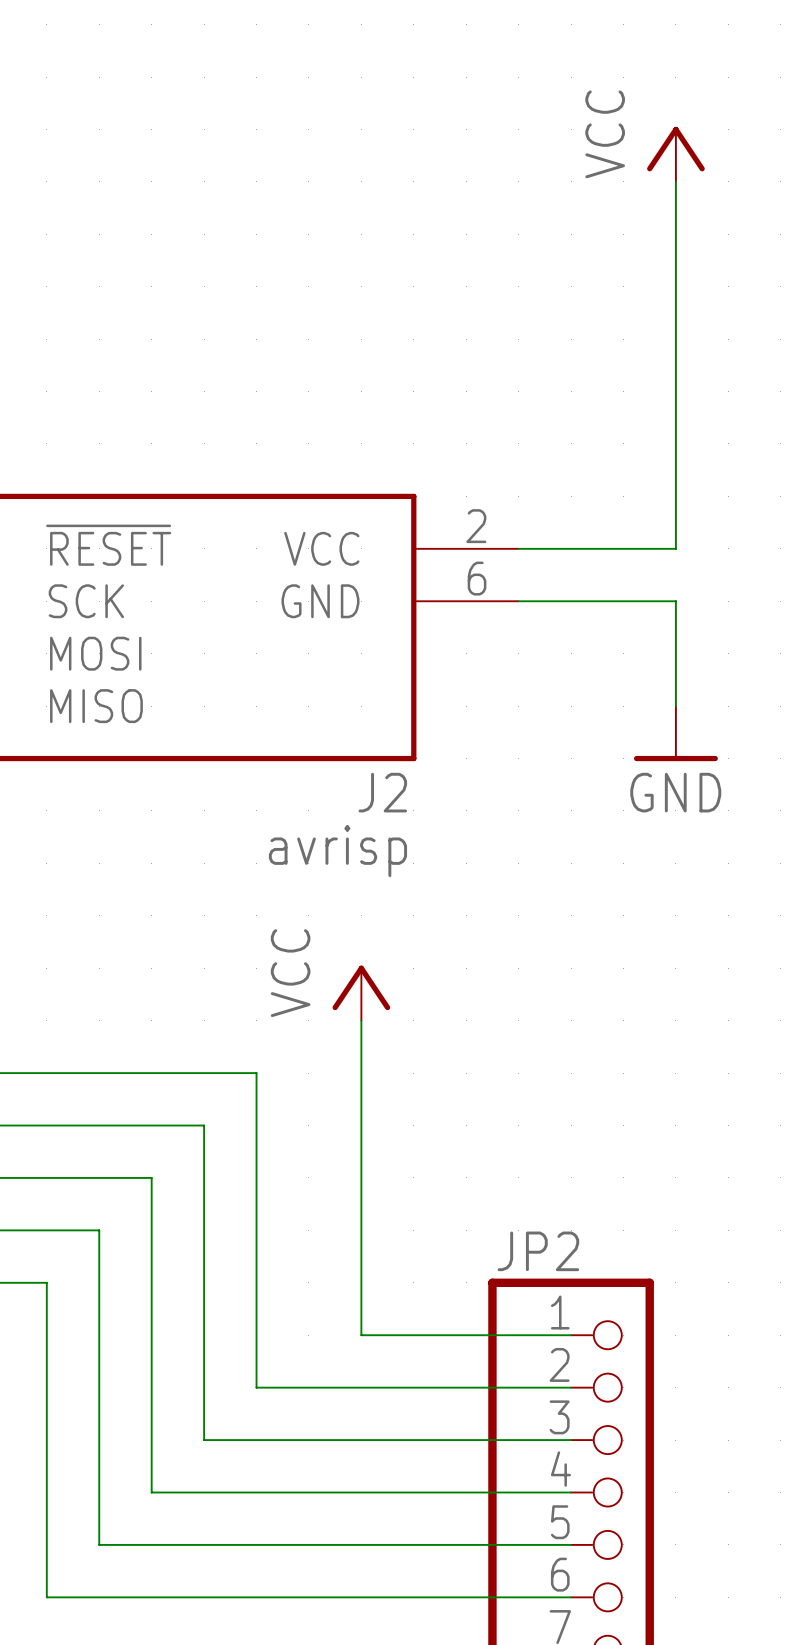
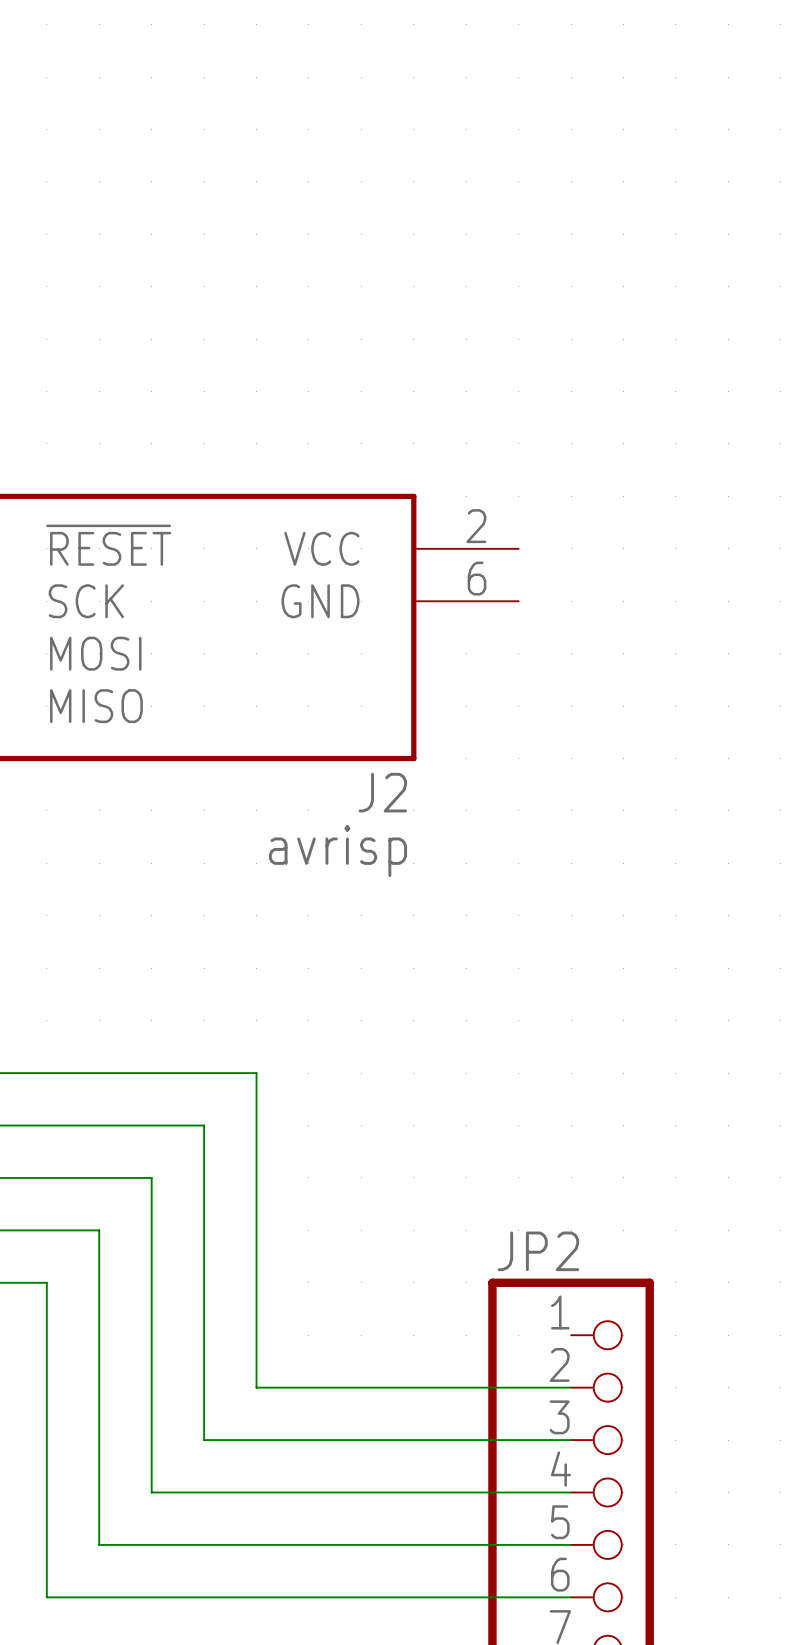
power symbol: VCC (675, 154) -> none
wire: (675, 181) (675, 548) (518, 548) -> none
wire: (518, 601) (675, 601) (675, 706) -> none
power symbol: GND (675, 733) -> none
power symbol: VCC (361, 993) -> none
wire: (361, 1020) (361, 1335) (571, 1335) -> none

